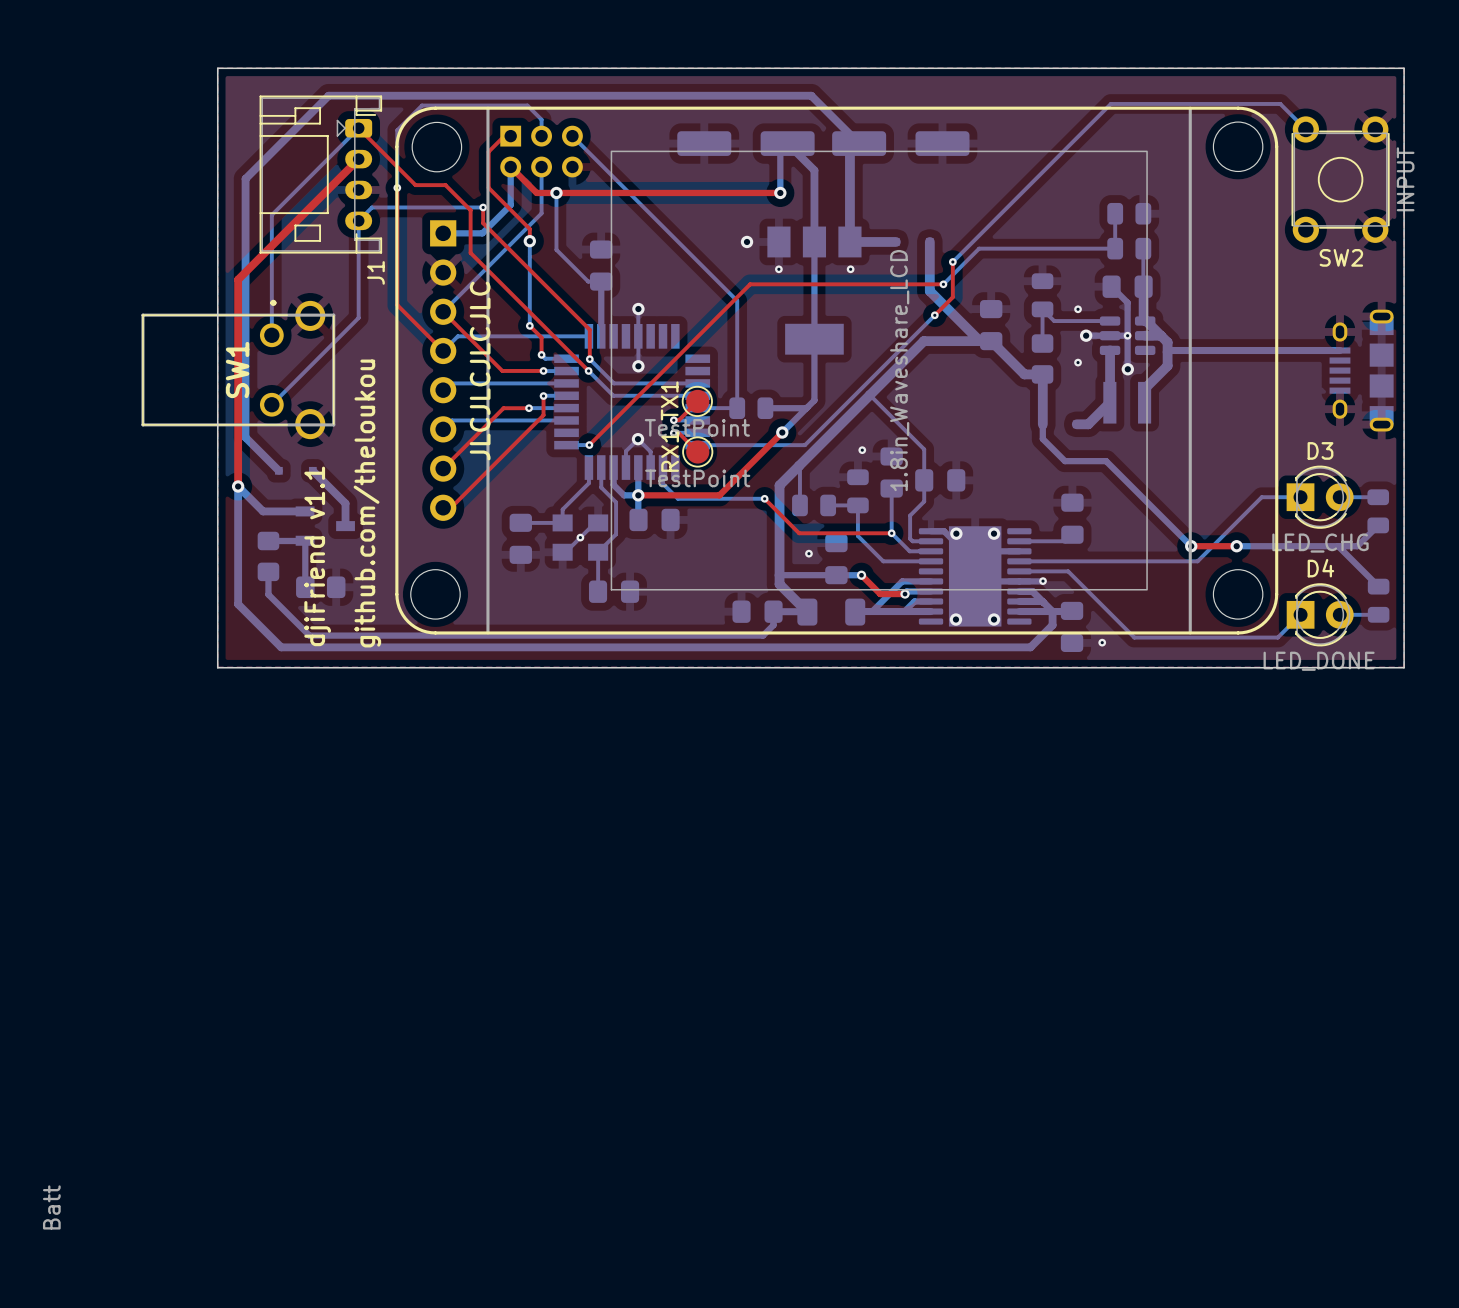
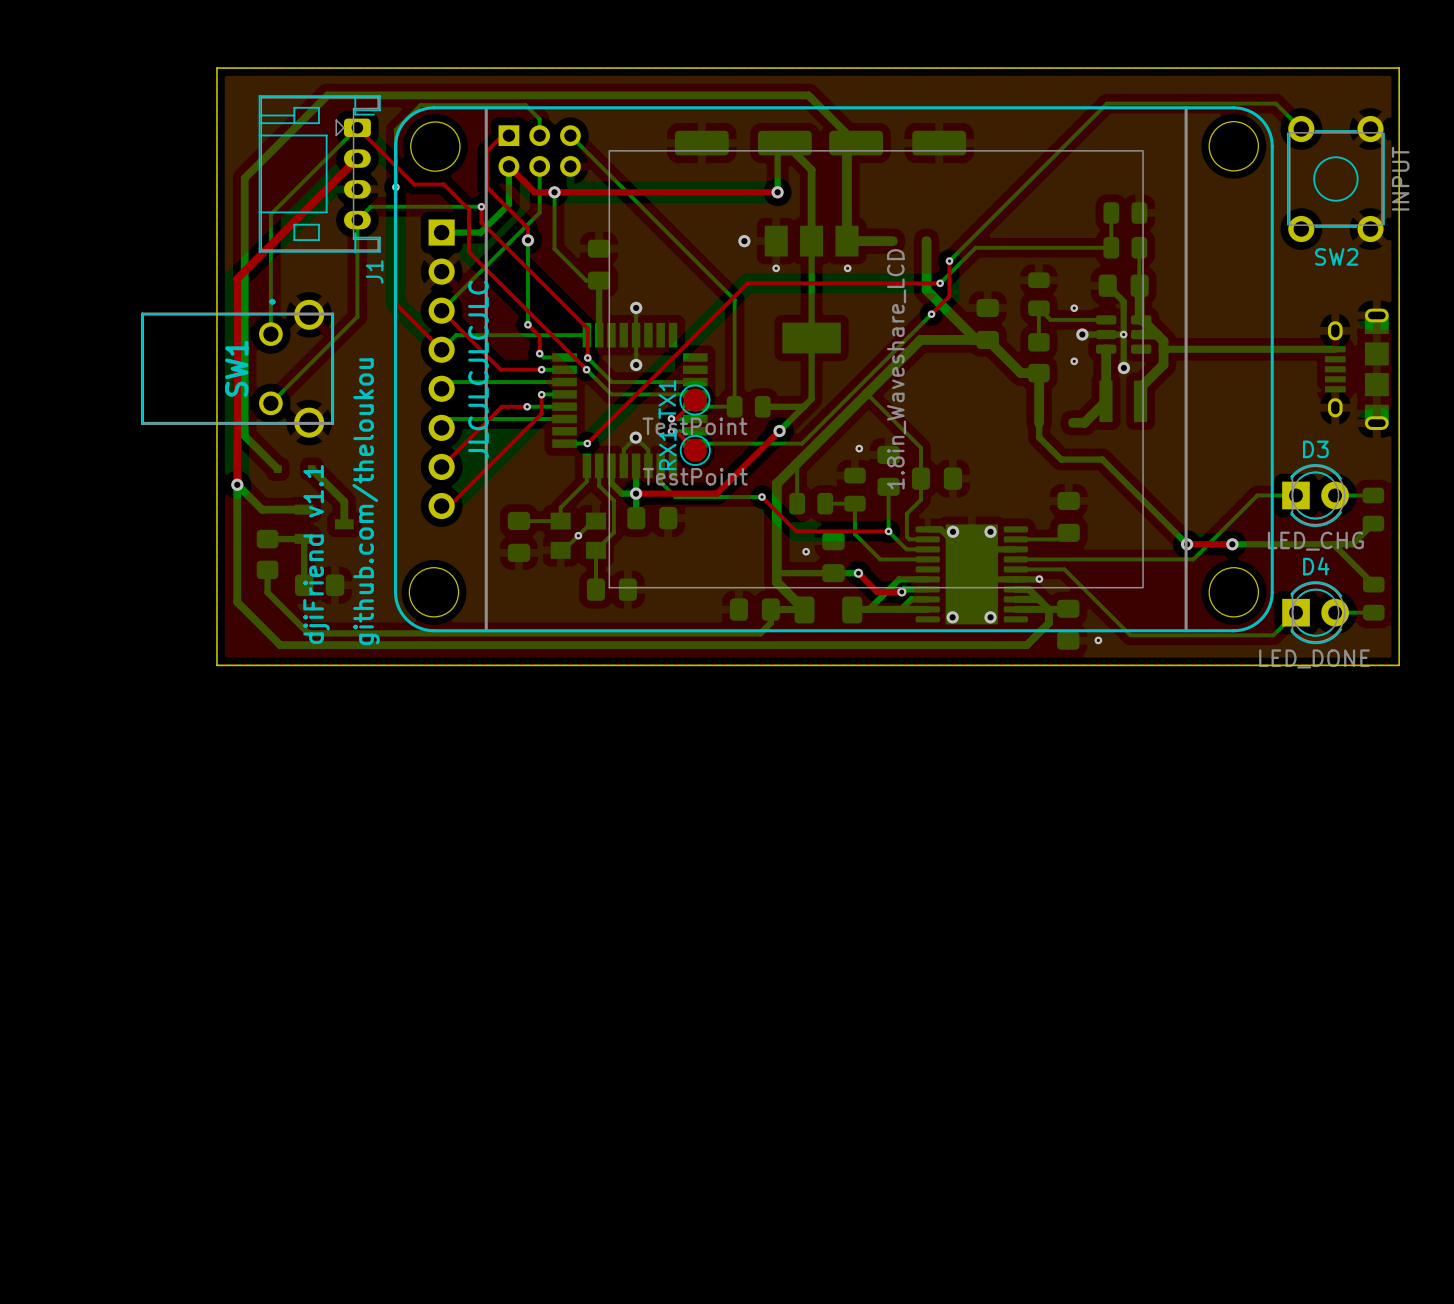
J1 value: Batt (51, 1207) -> none

